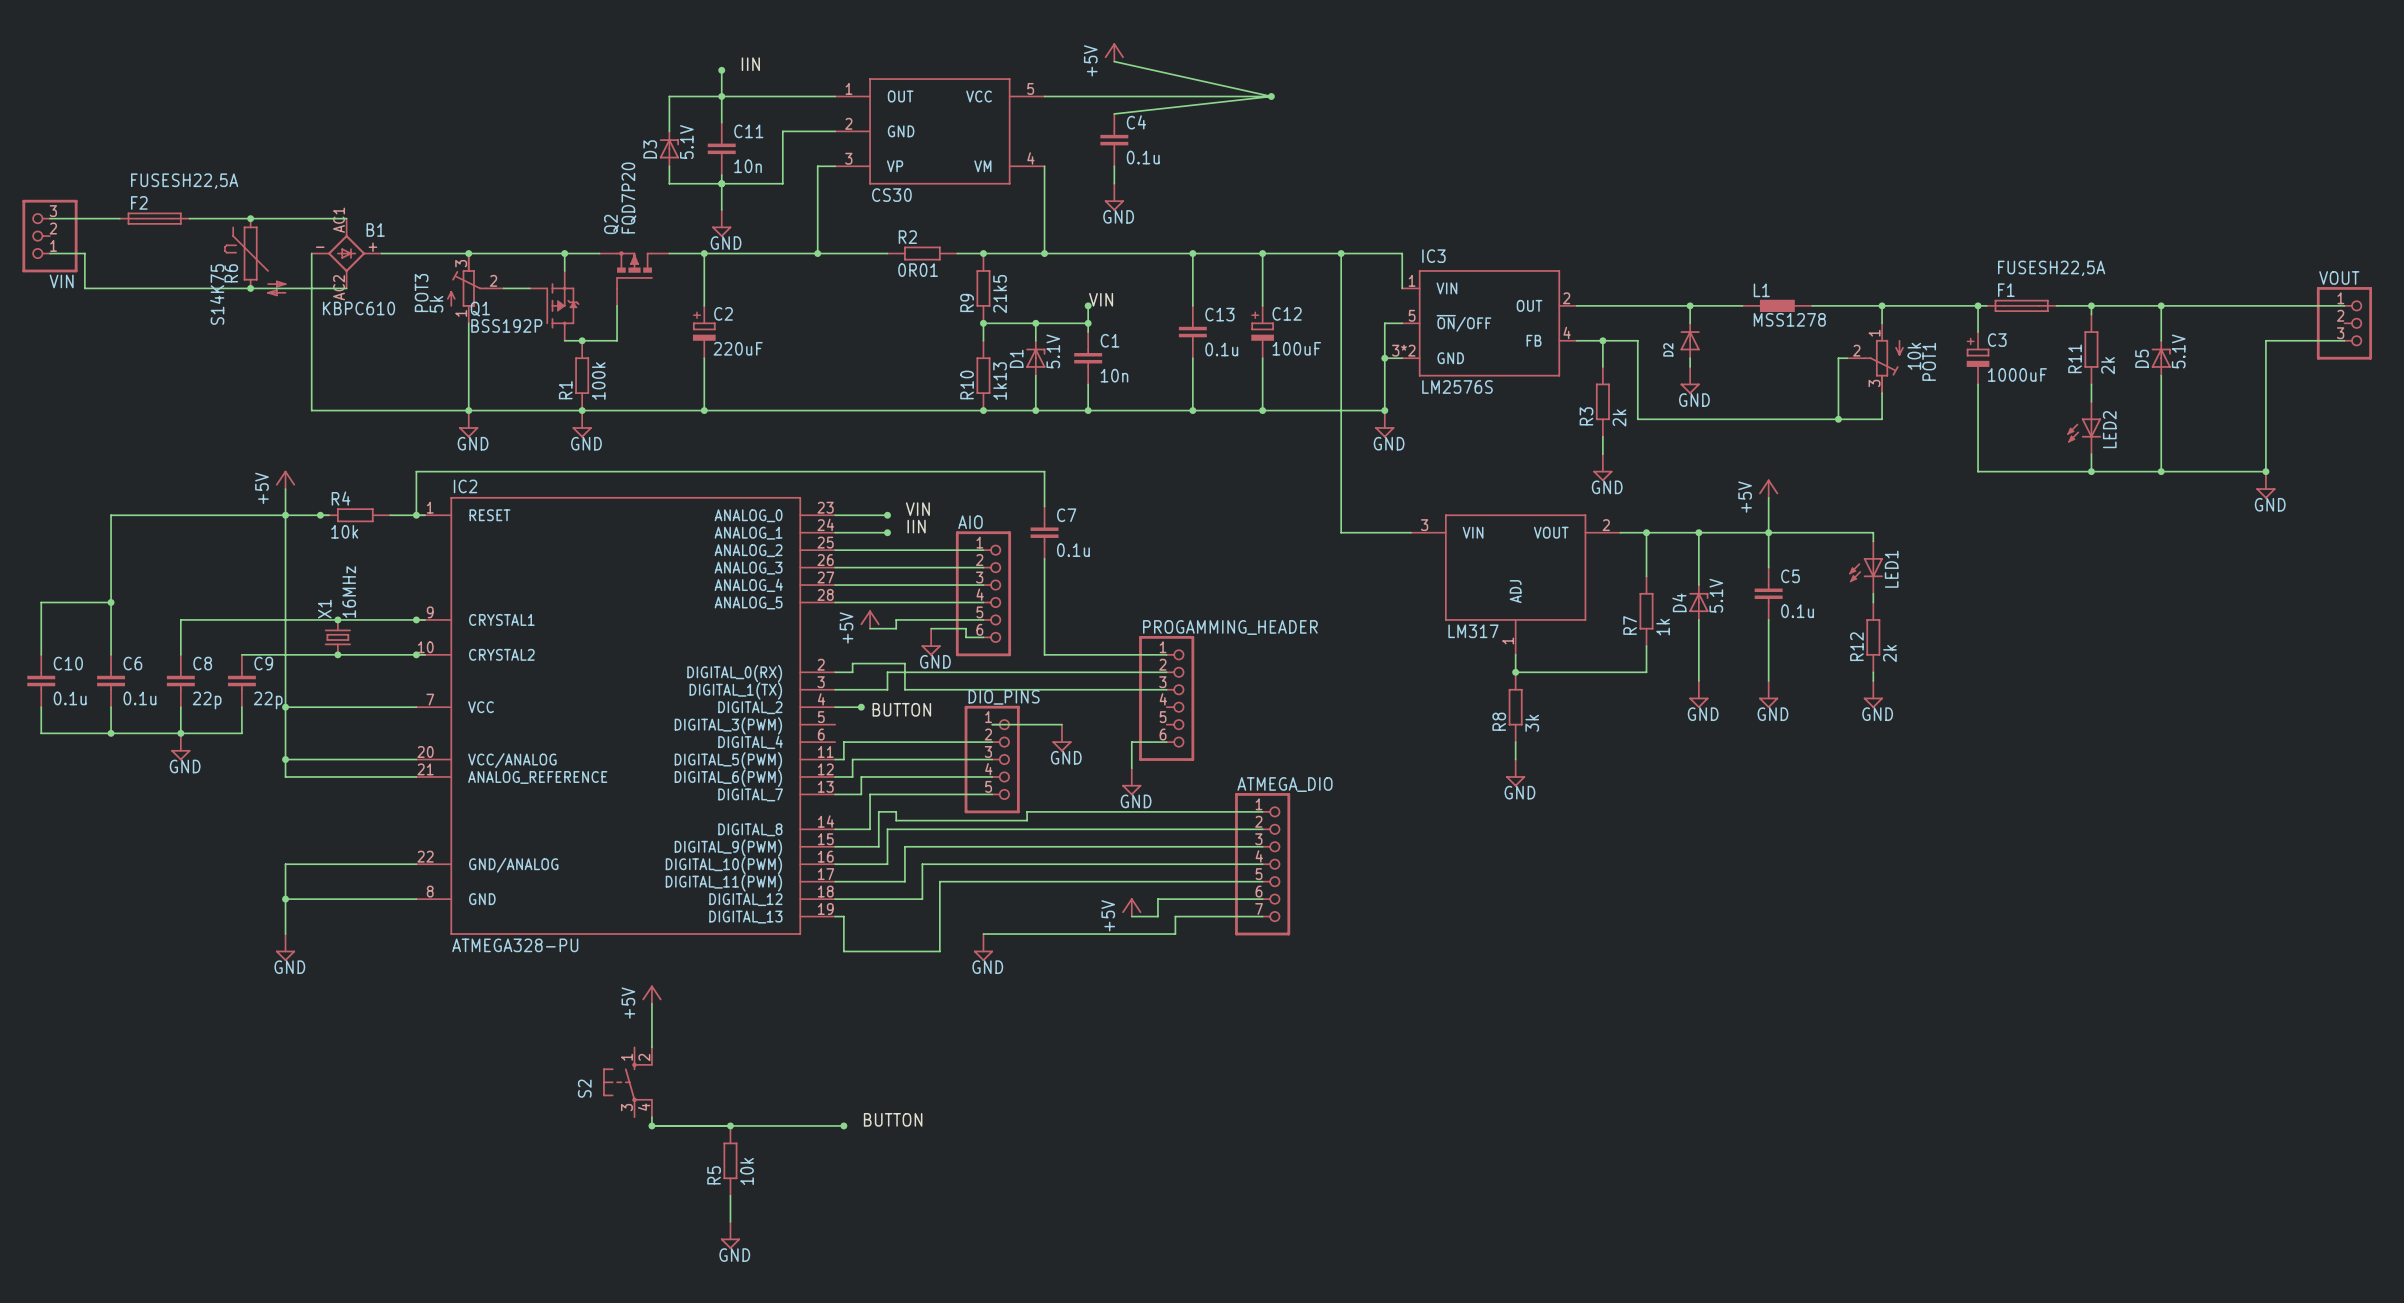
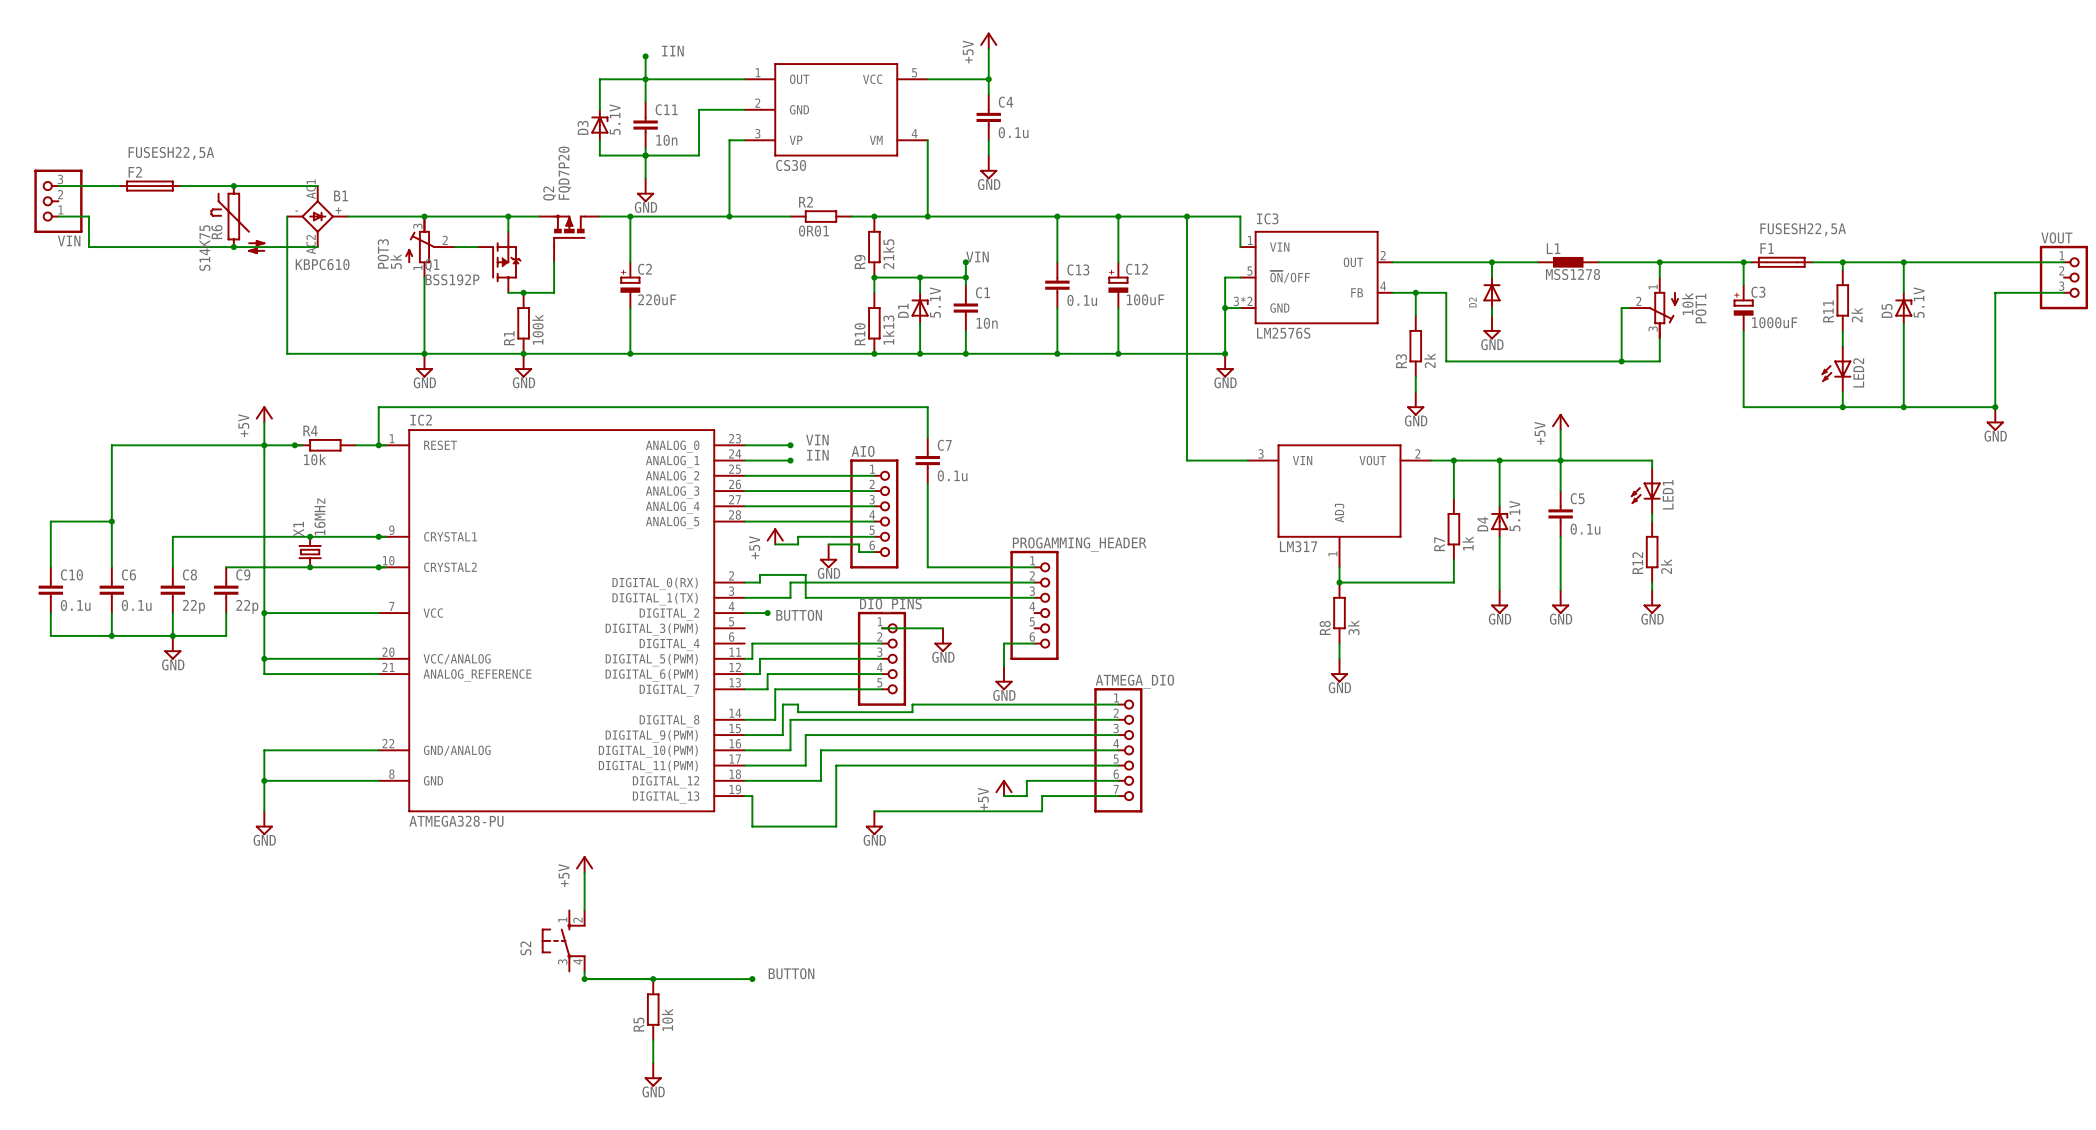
wire: (1114, 61) (1271, 96) -> (988, 48) (988, 94)
wire: (1114, 96) (1271, 96) -> none
junction: none -> (988, 79)
wire: (1271, 96) (1114, 113) -> none
junction: (1271, 96) -> none

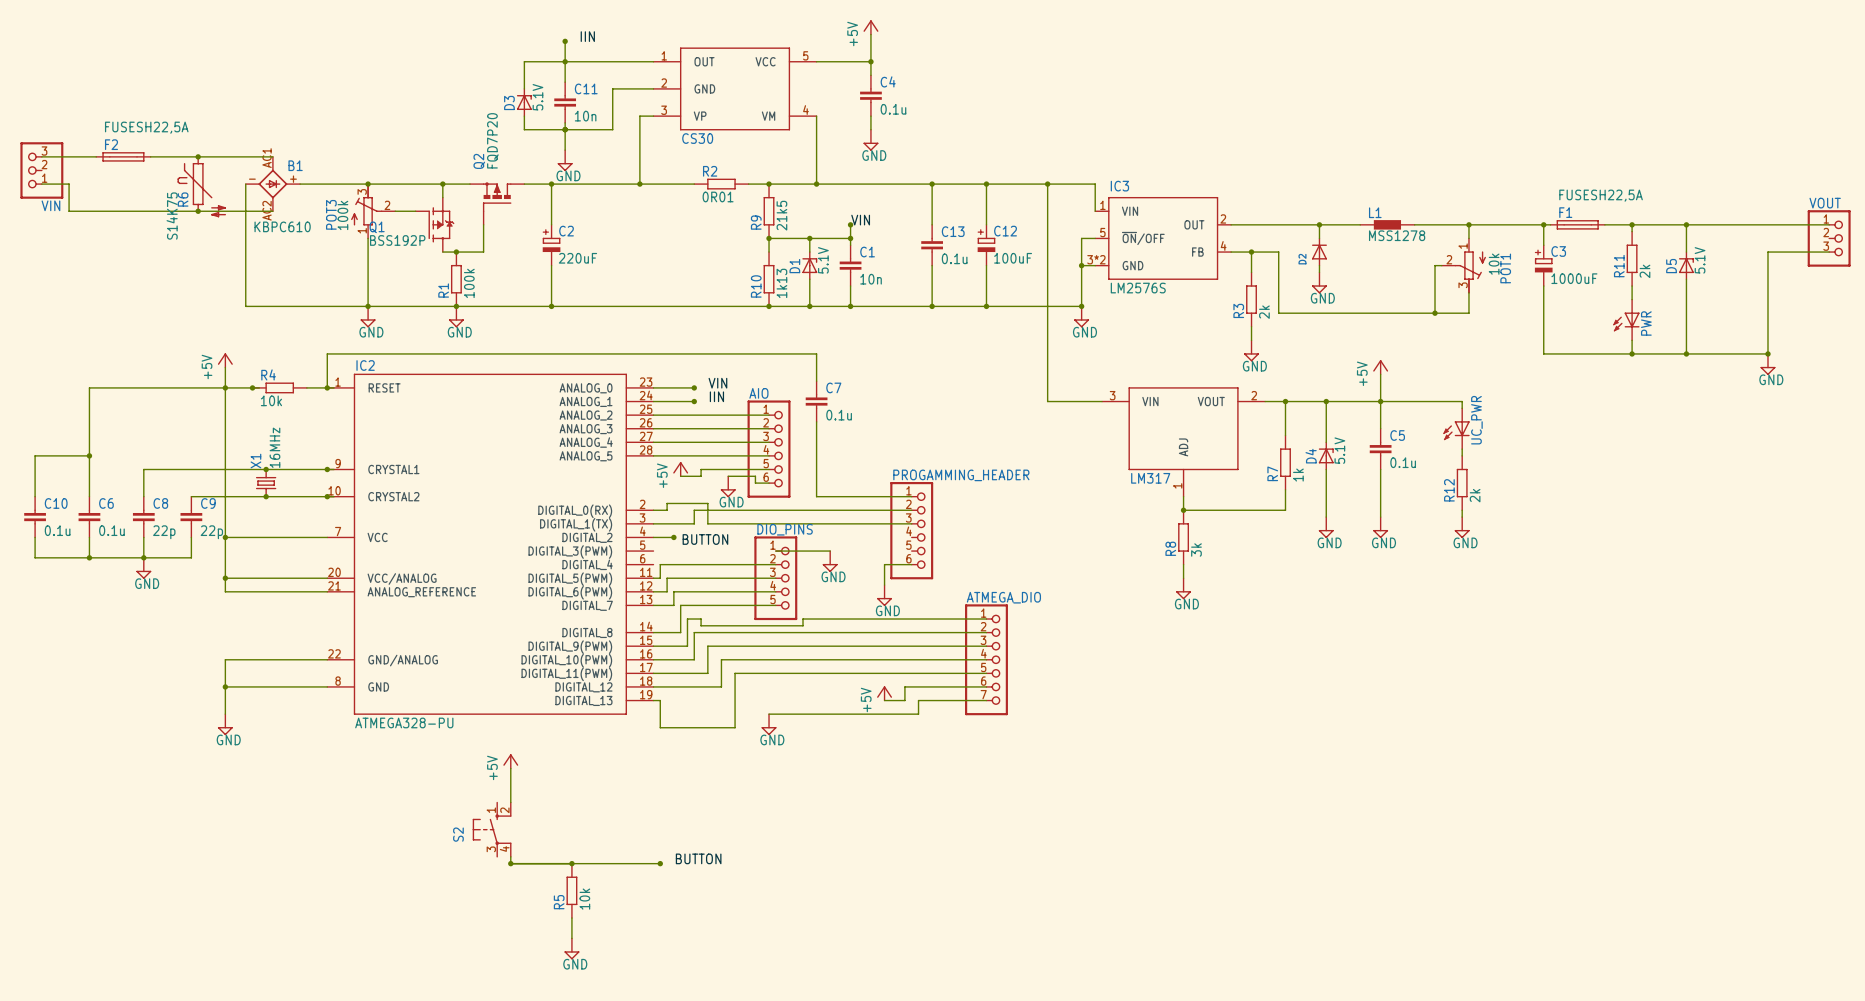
POT3 value: 5k (396, 261) -> 100k (342, 215)
LED2 name: LED2 (1858, 372) -> PWR (1646, 323)
LED1 name: LED1 (1668, 494) -> UC_PWR (1476, 420)

